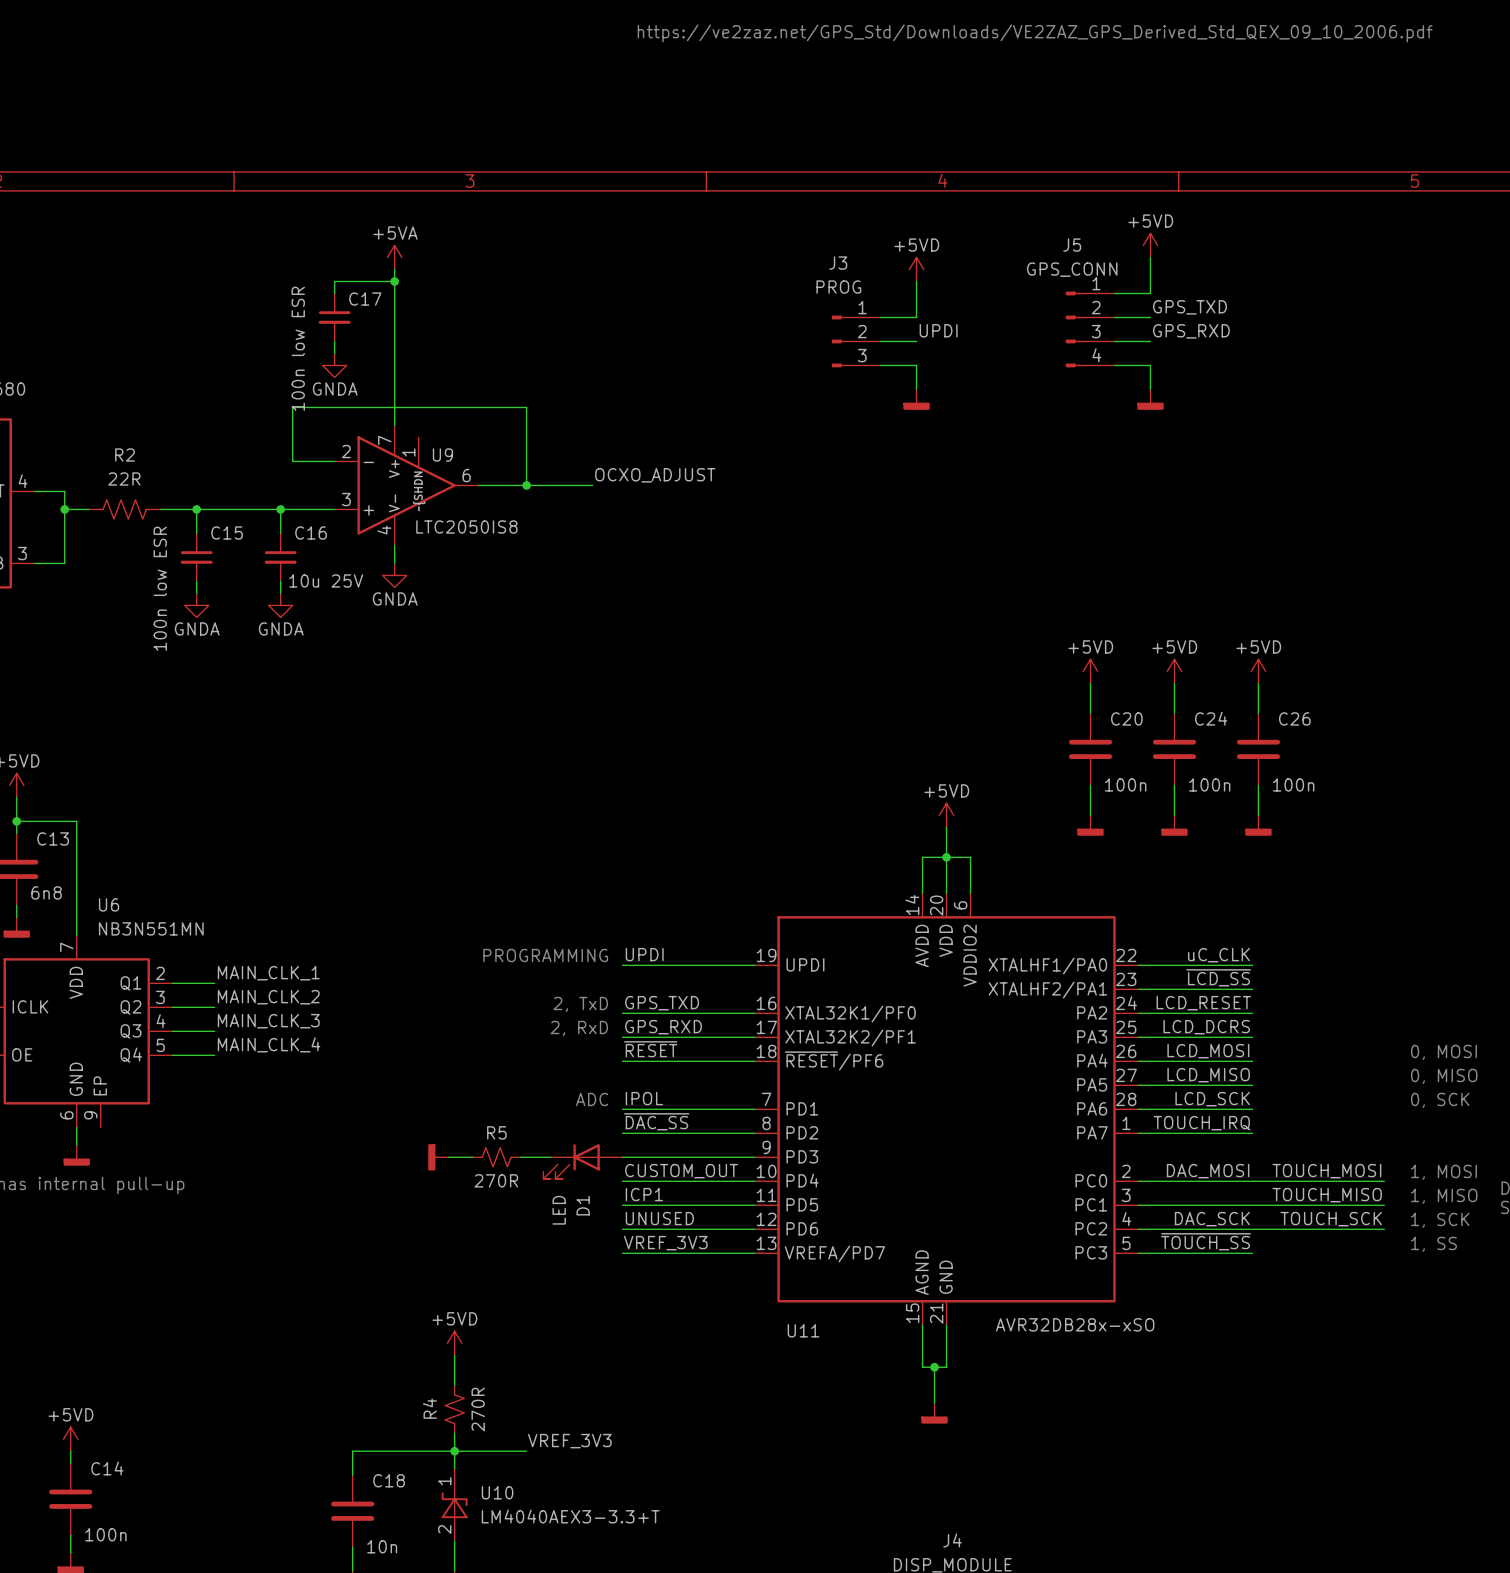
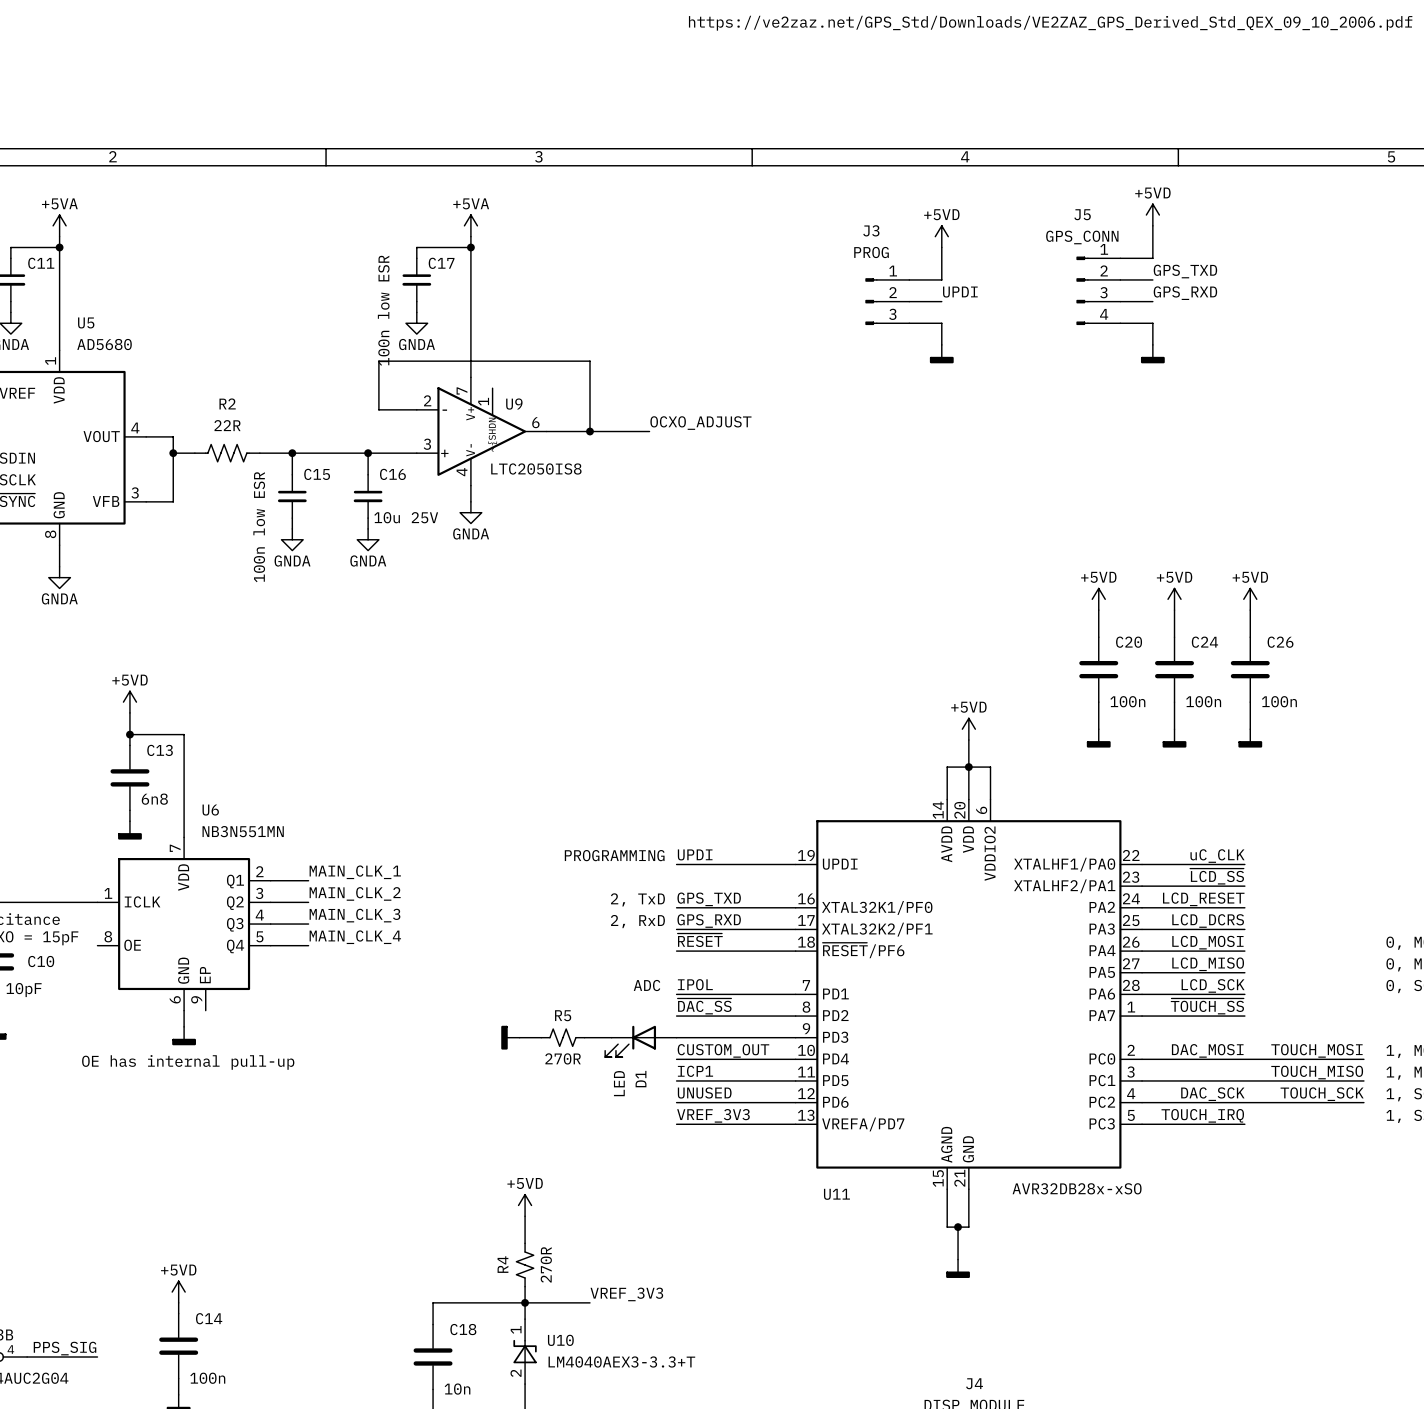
label: TOUCH_IRQ (1202, 1123) -> ~{TOUCH_SS} (1207, 1006)
label: ~{TOUCH_SS} (1206, 1241) -> TOUCH_IRQ (1202, 1115)

